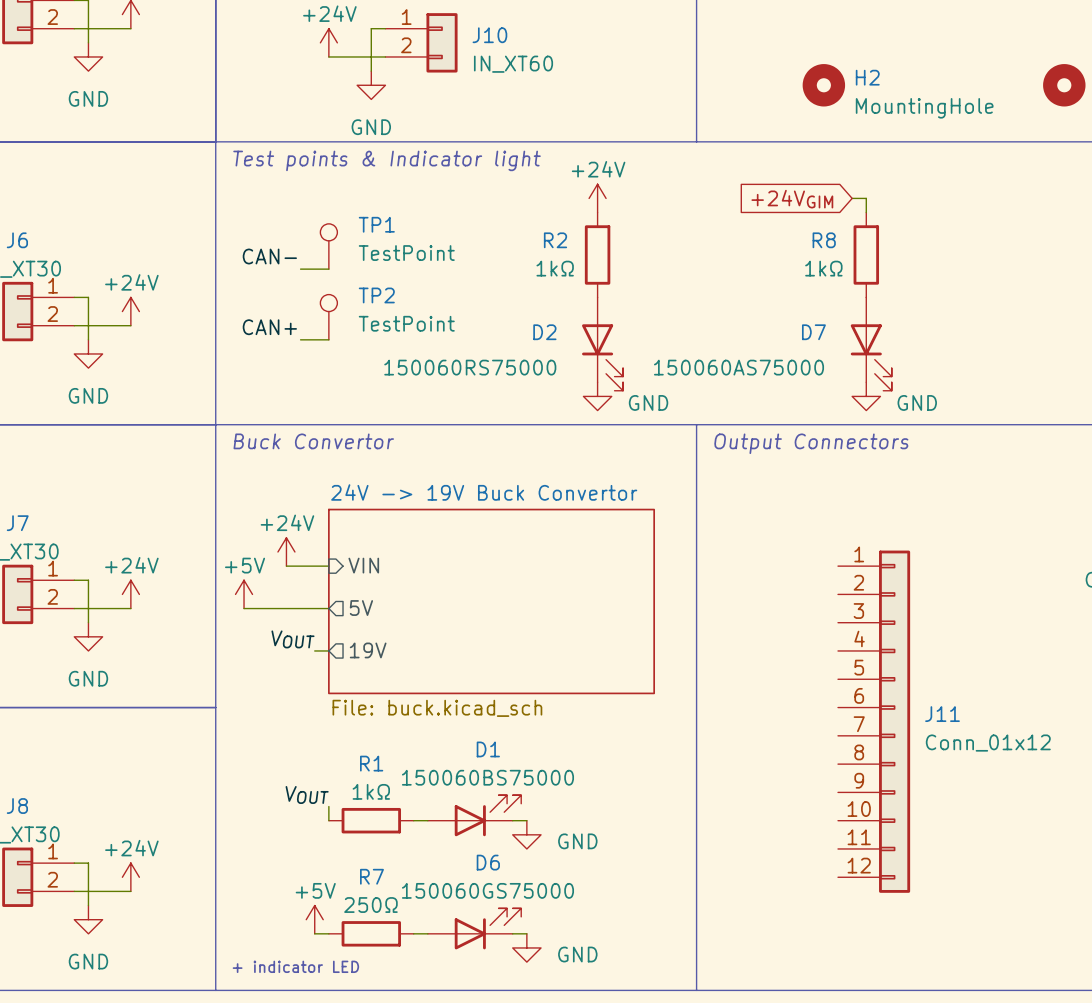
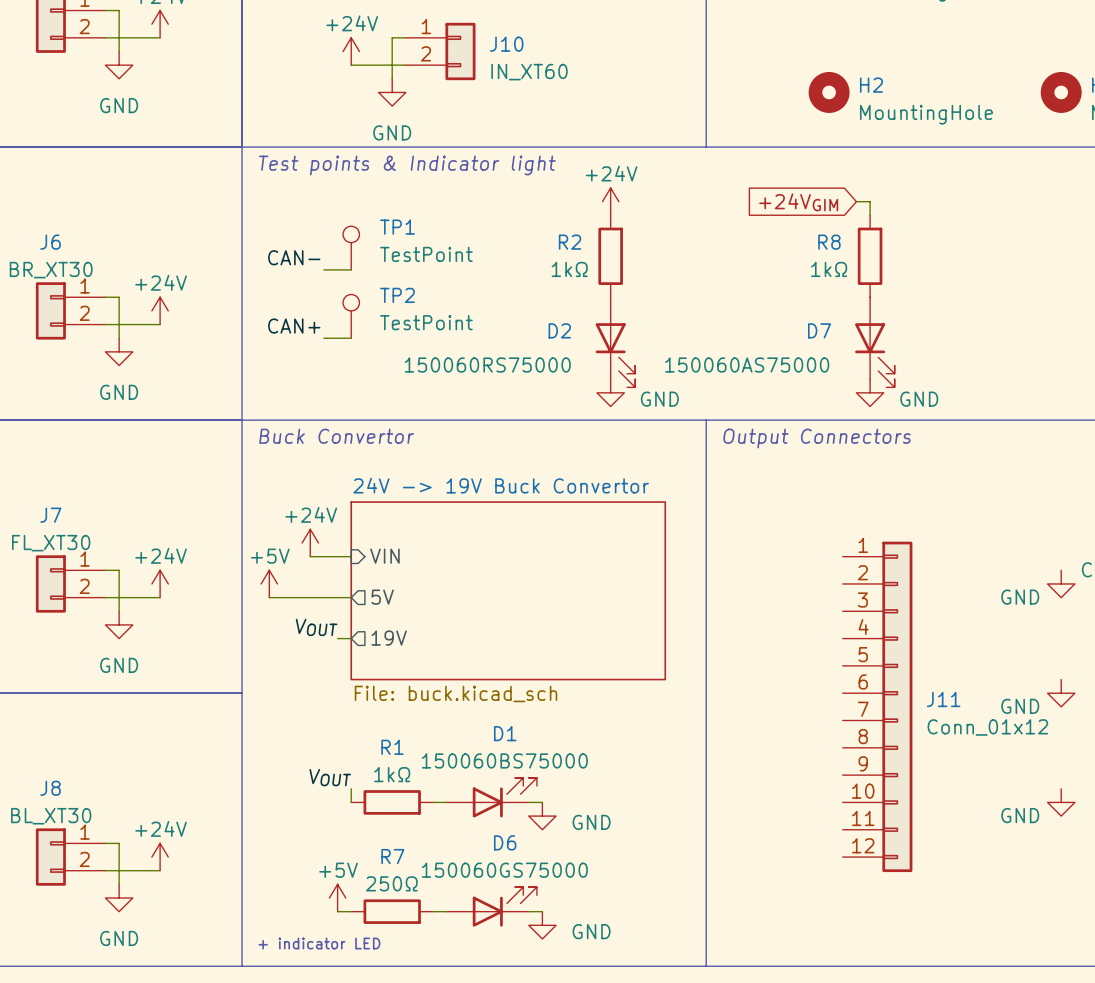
power symbol: none -> GND (1061, 583)
power symbol: none -> GND (1061, 693)
power symbol: none -> GND (1061, 802)

